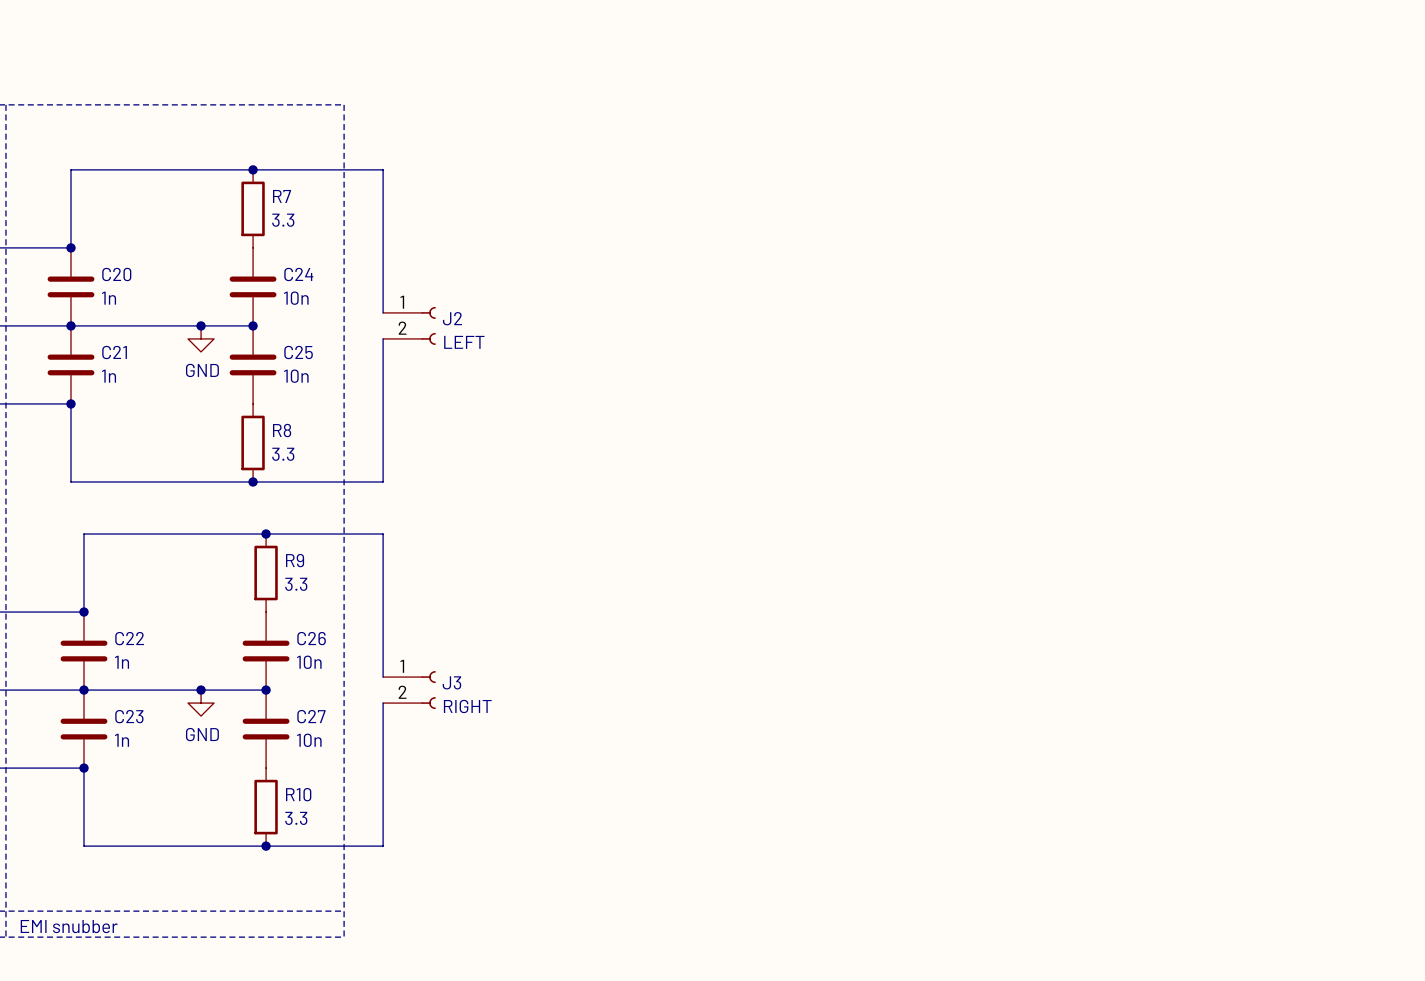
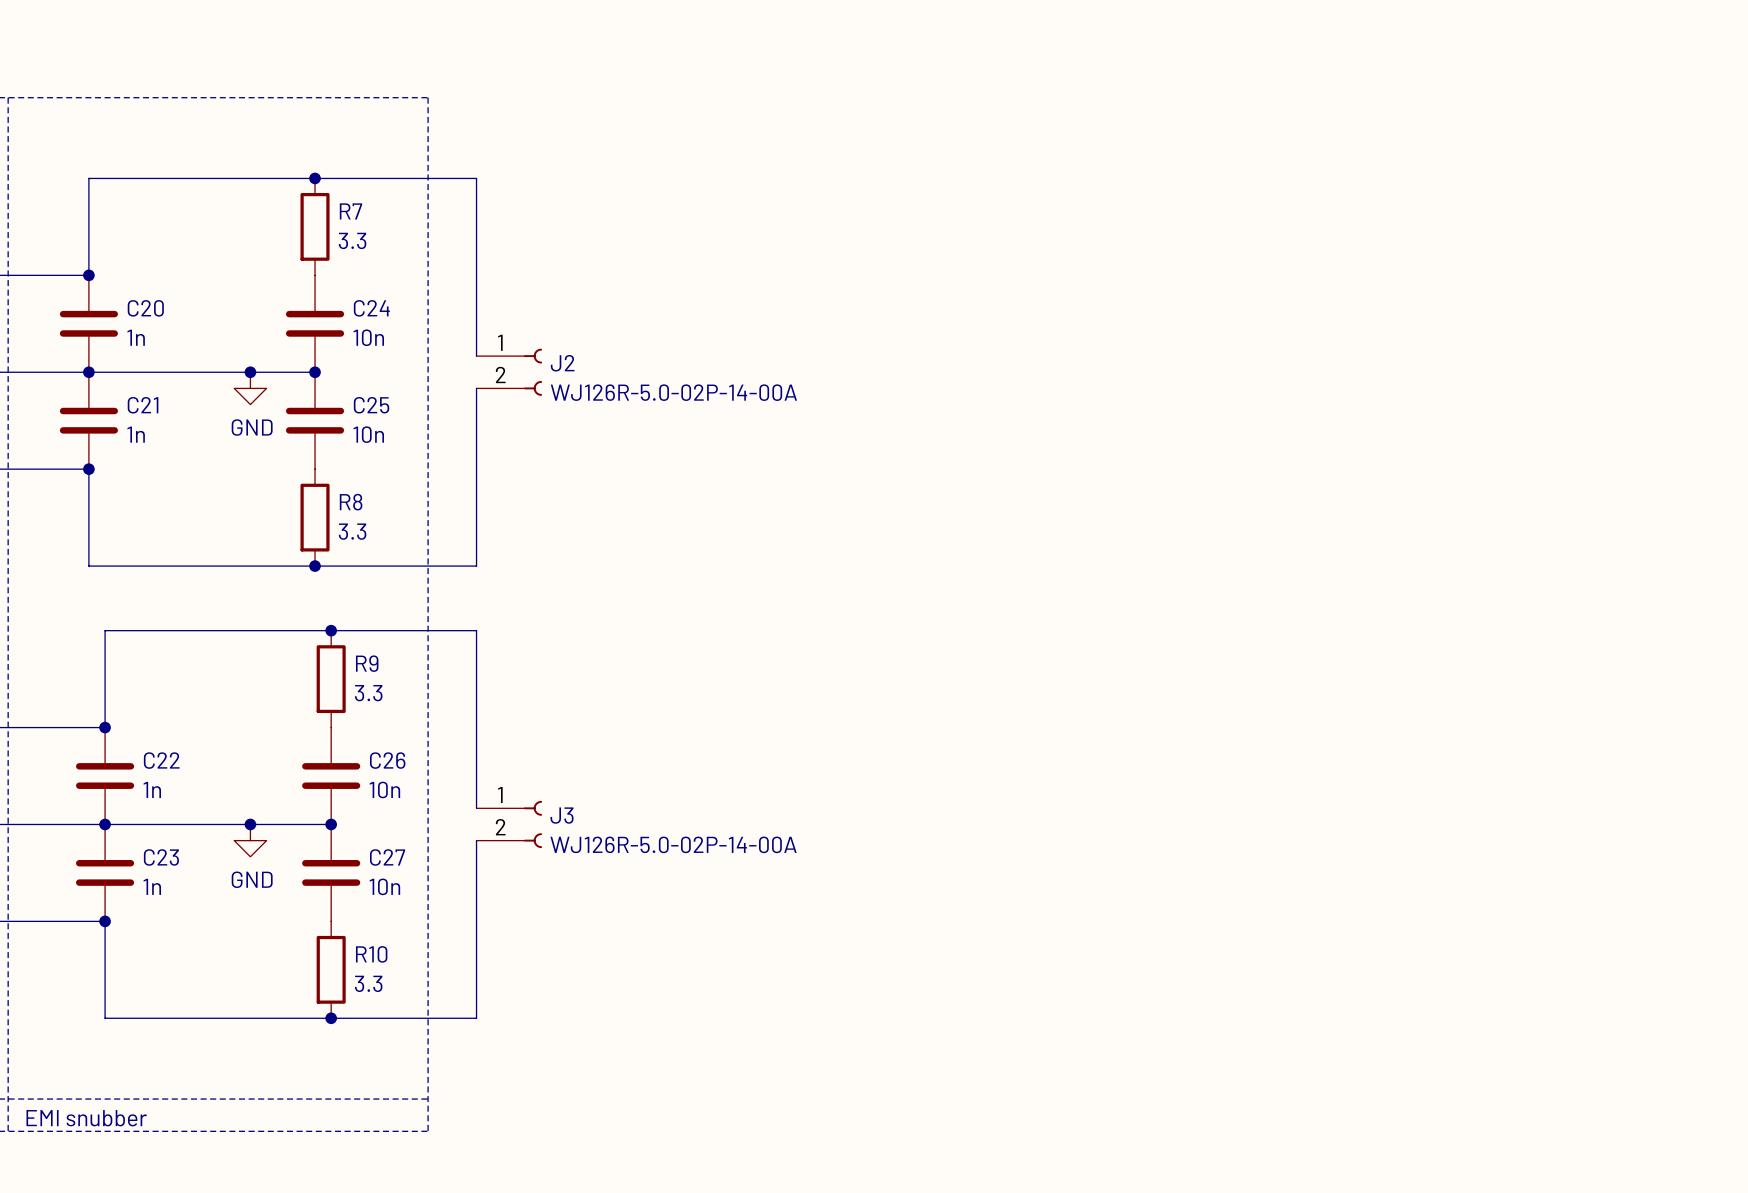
J2 value: LEFT (464, 342) -> WJ126R-5.0-02P-14-00A (673, 392)
J3 value: RIGHT (467, 706) -> WJ126R-5.0-02P-14-00A (673, 844)

